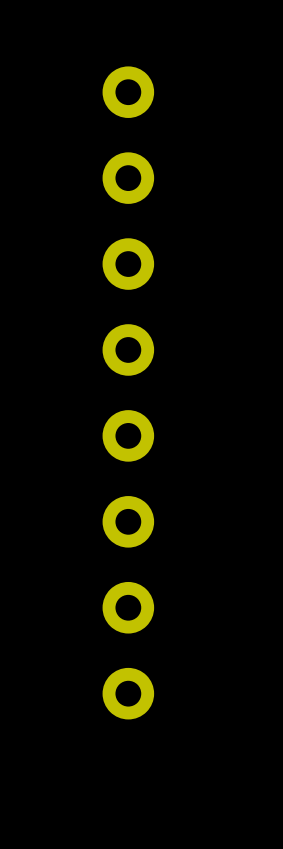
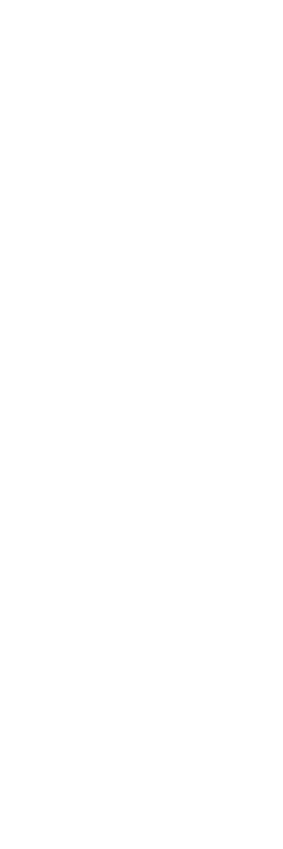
part: (128, 392) -> none

